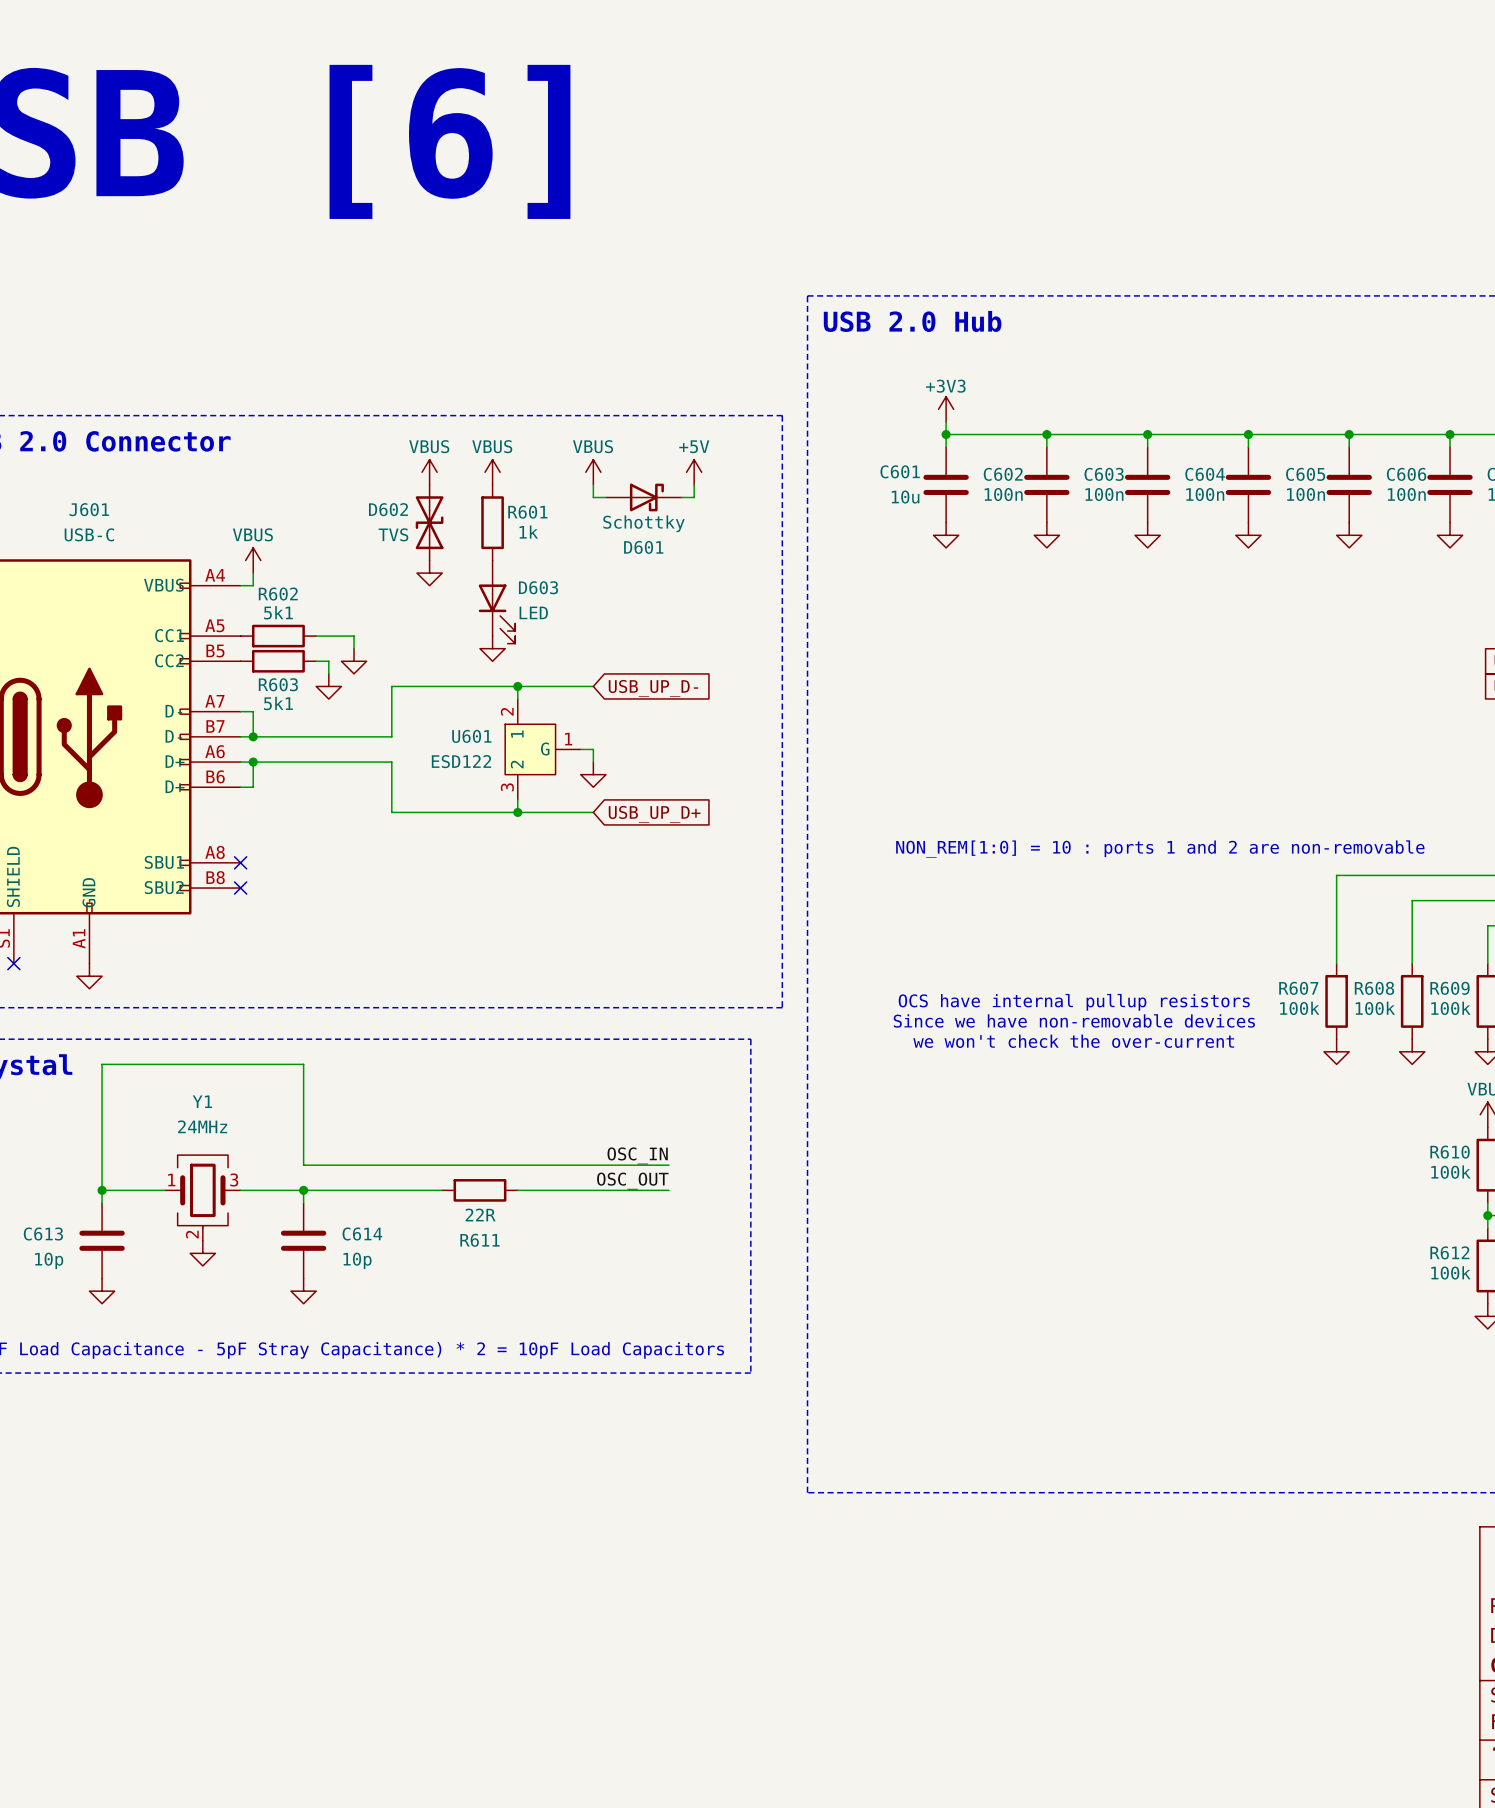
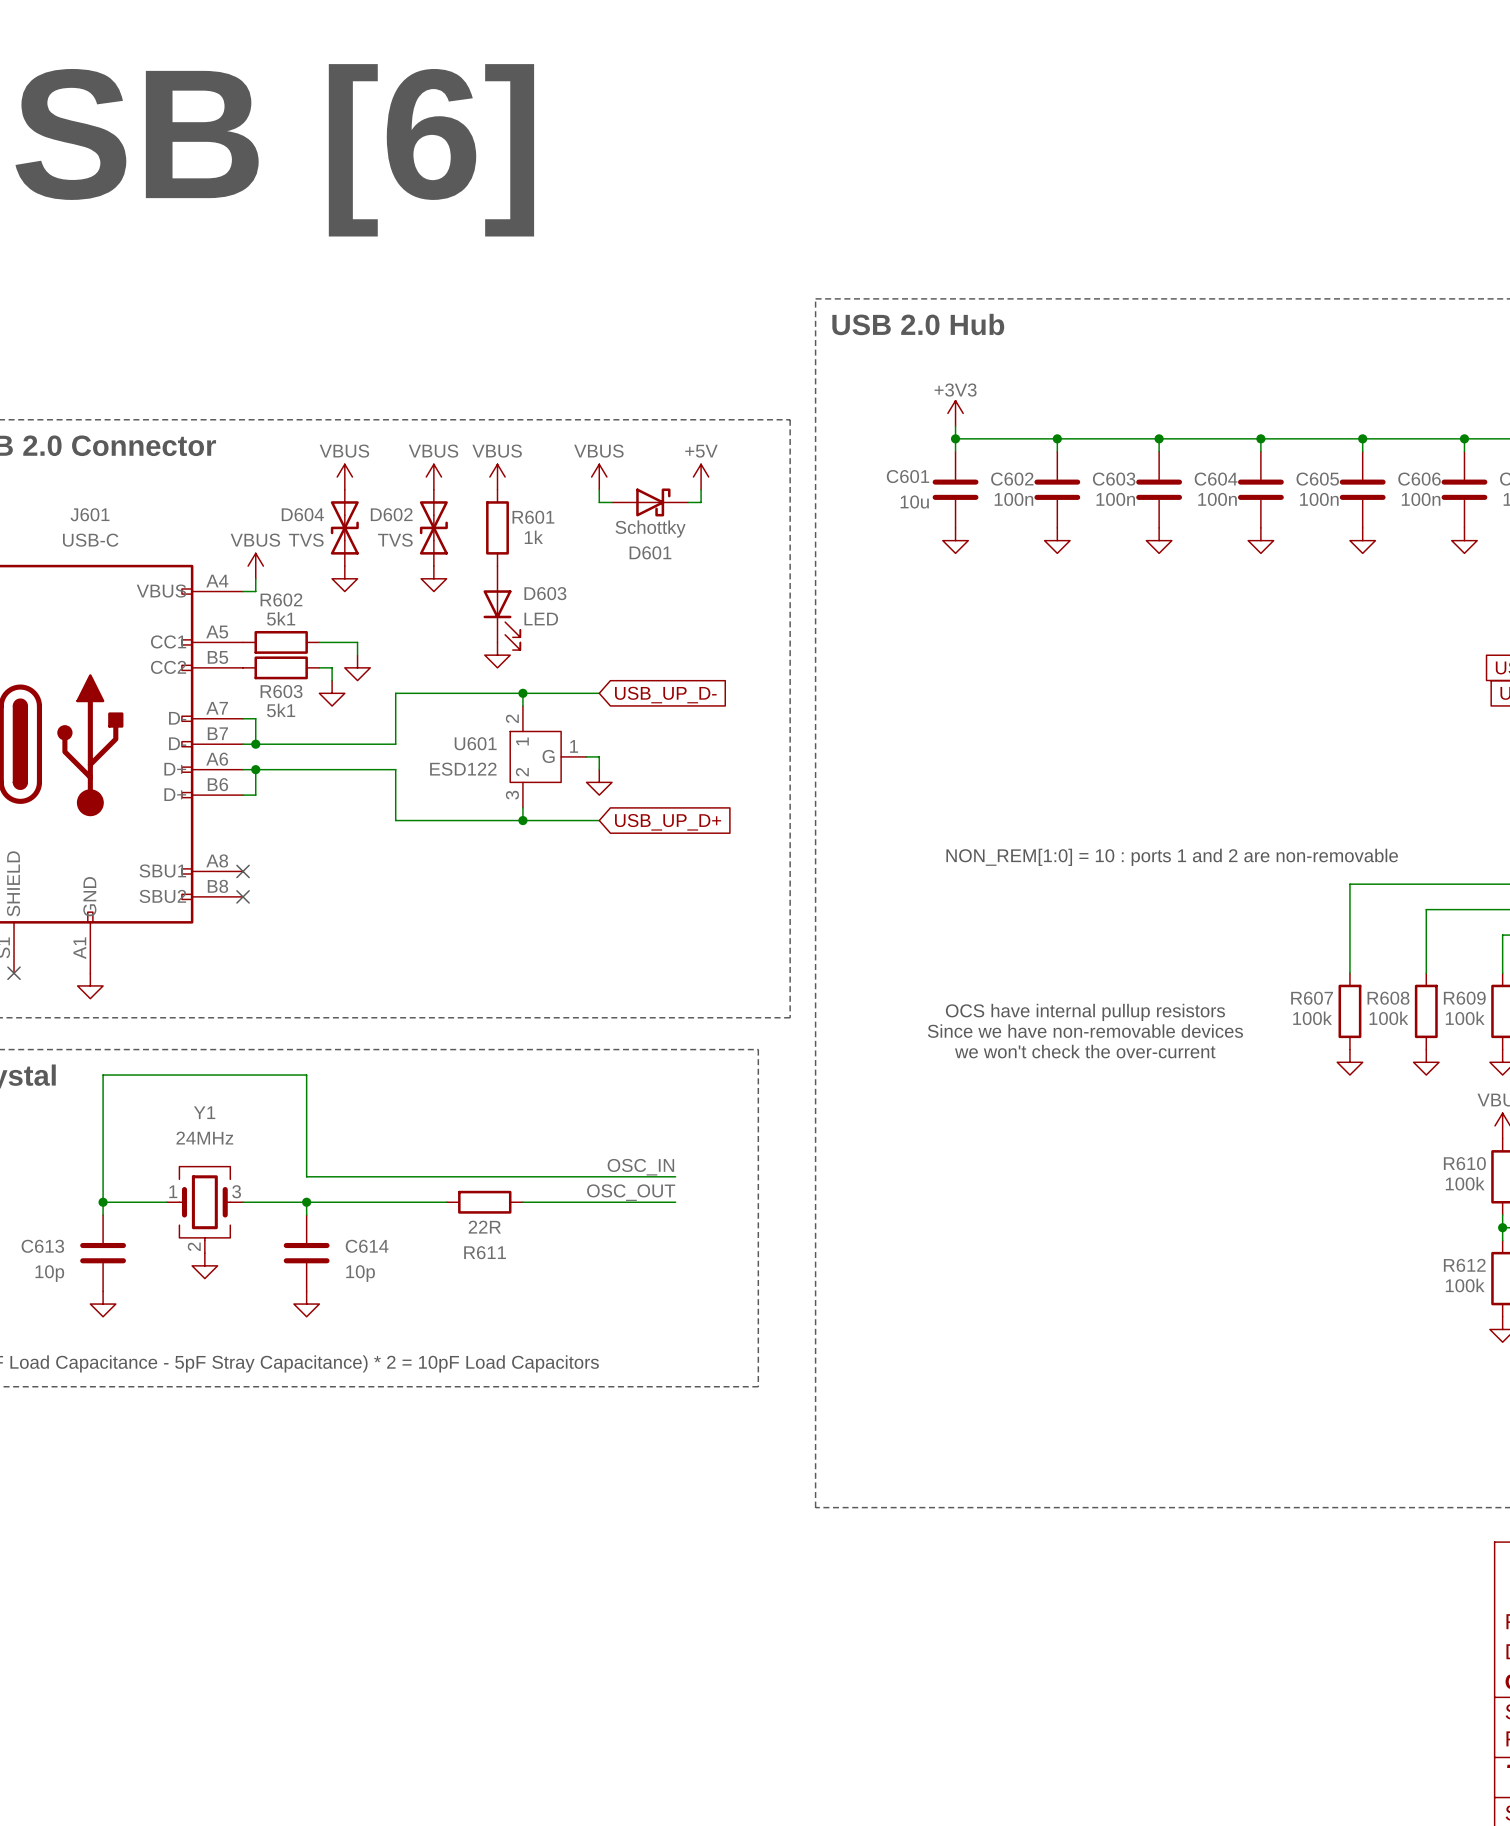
power symbol: none -> VBUS (344, 477)
D604: none -> TVS (344, 527)
power symbol: none -> (344, 578)

